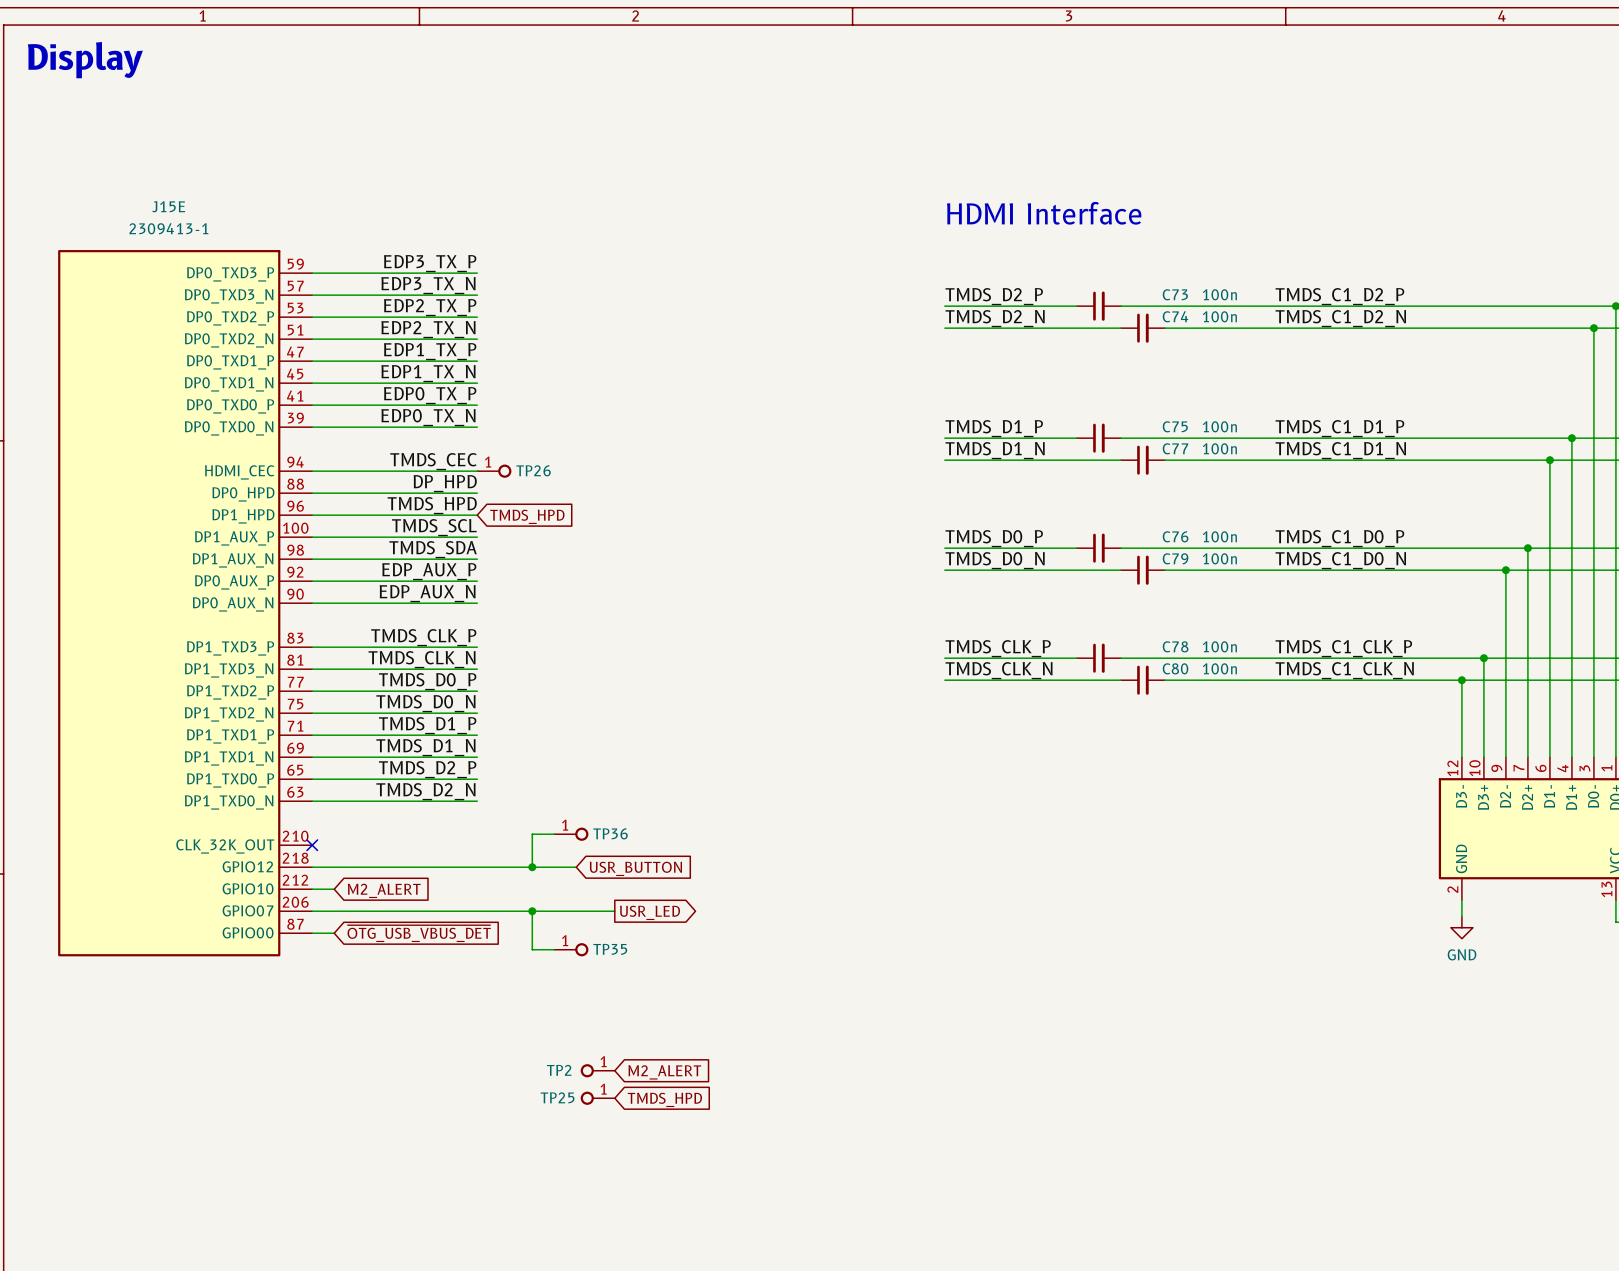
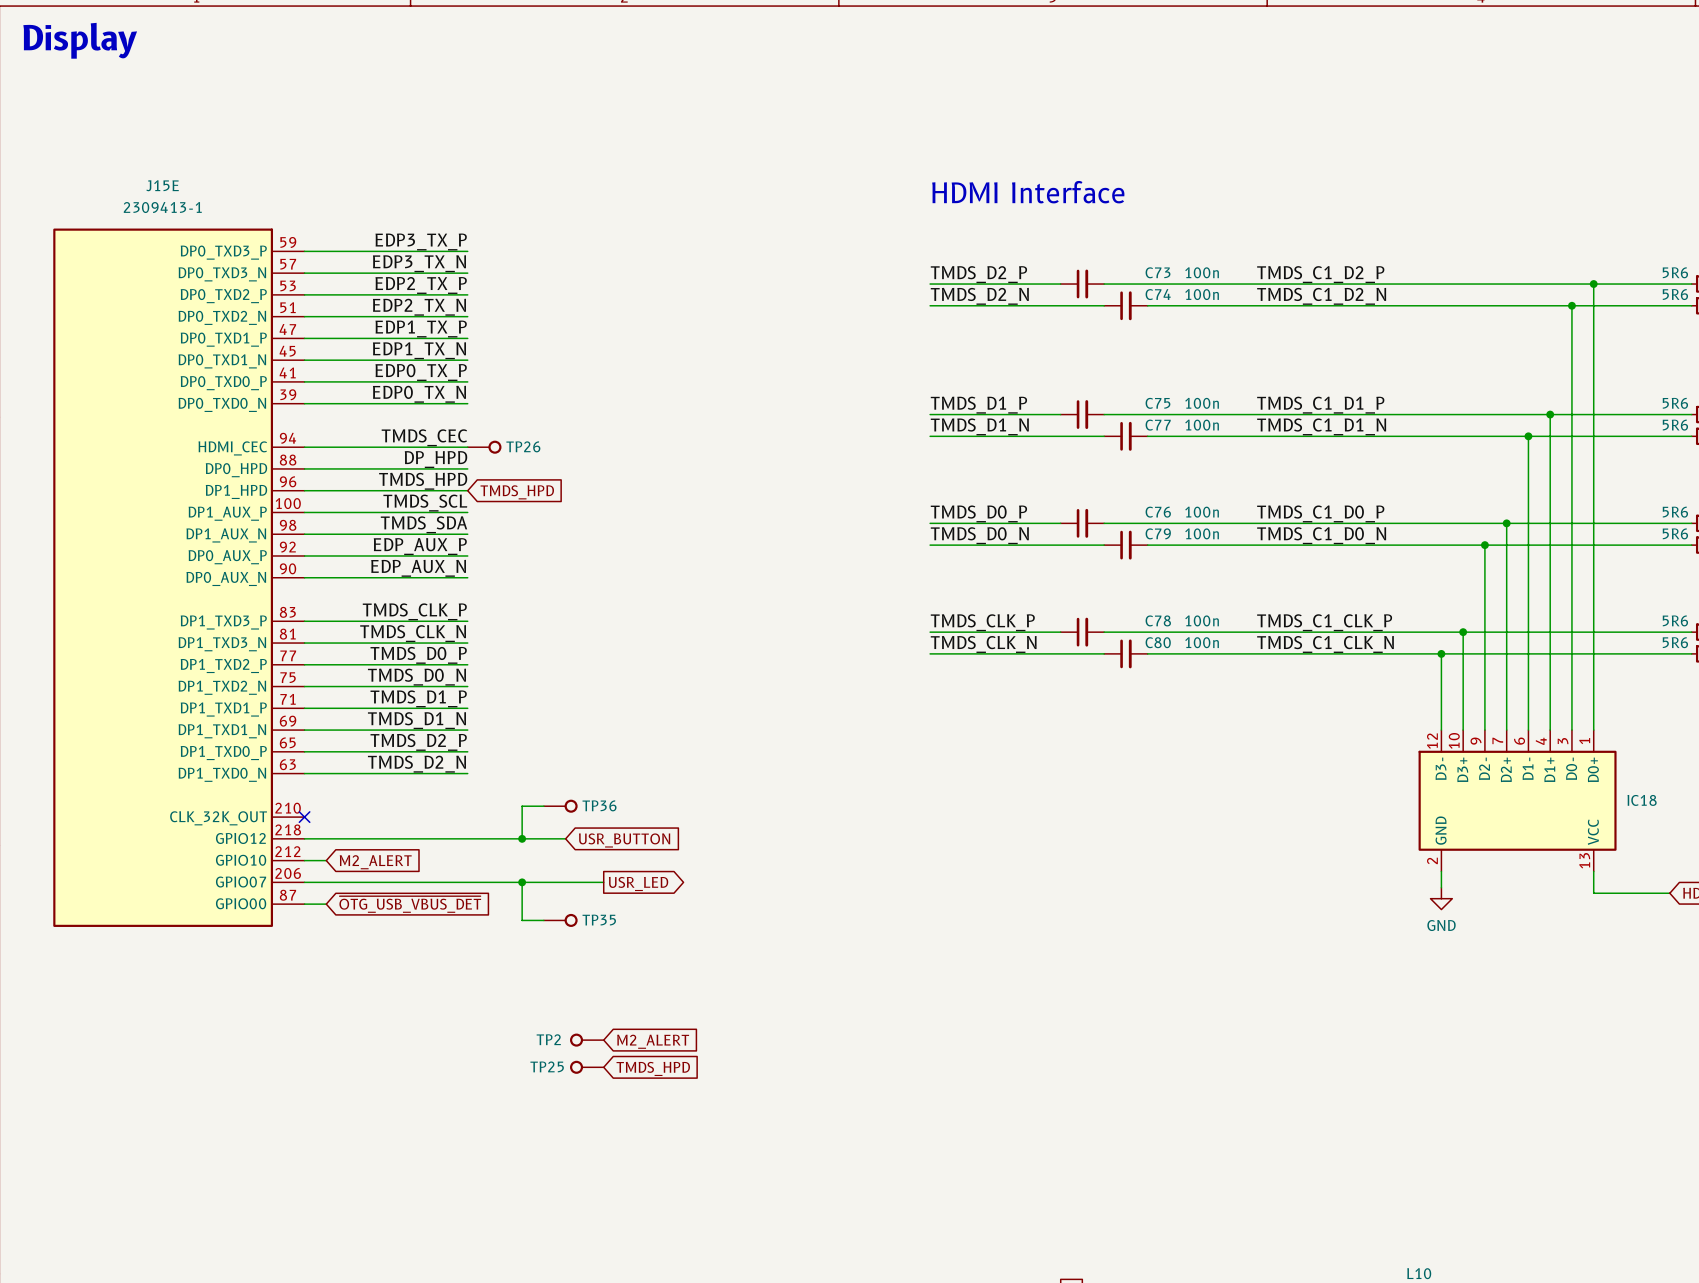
TP26 pin number: 1 (488, 462) -> none
TP36 pin number: 1 (565, 825) -> none
TP35 pin number: 1 (565, 940) -> none
TP2 pin number: 1 (603, 1061) -> none
TP25 pin number: 1 (603, 1089) -> none

